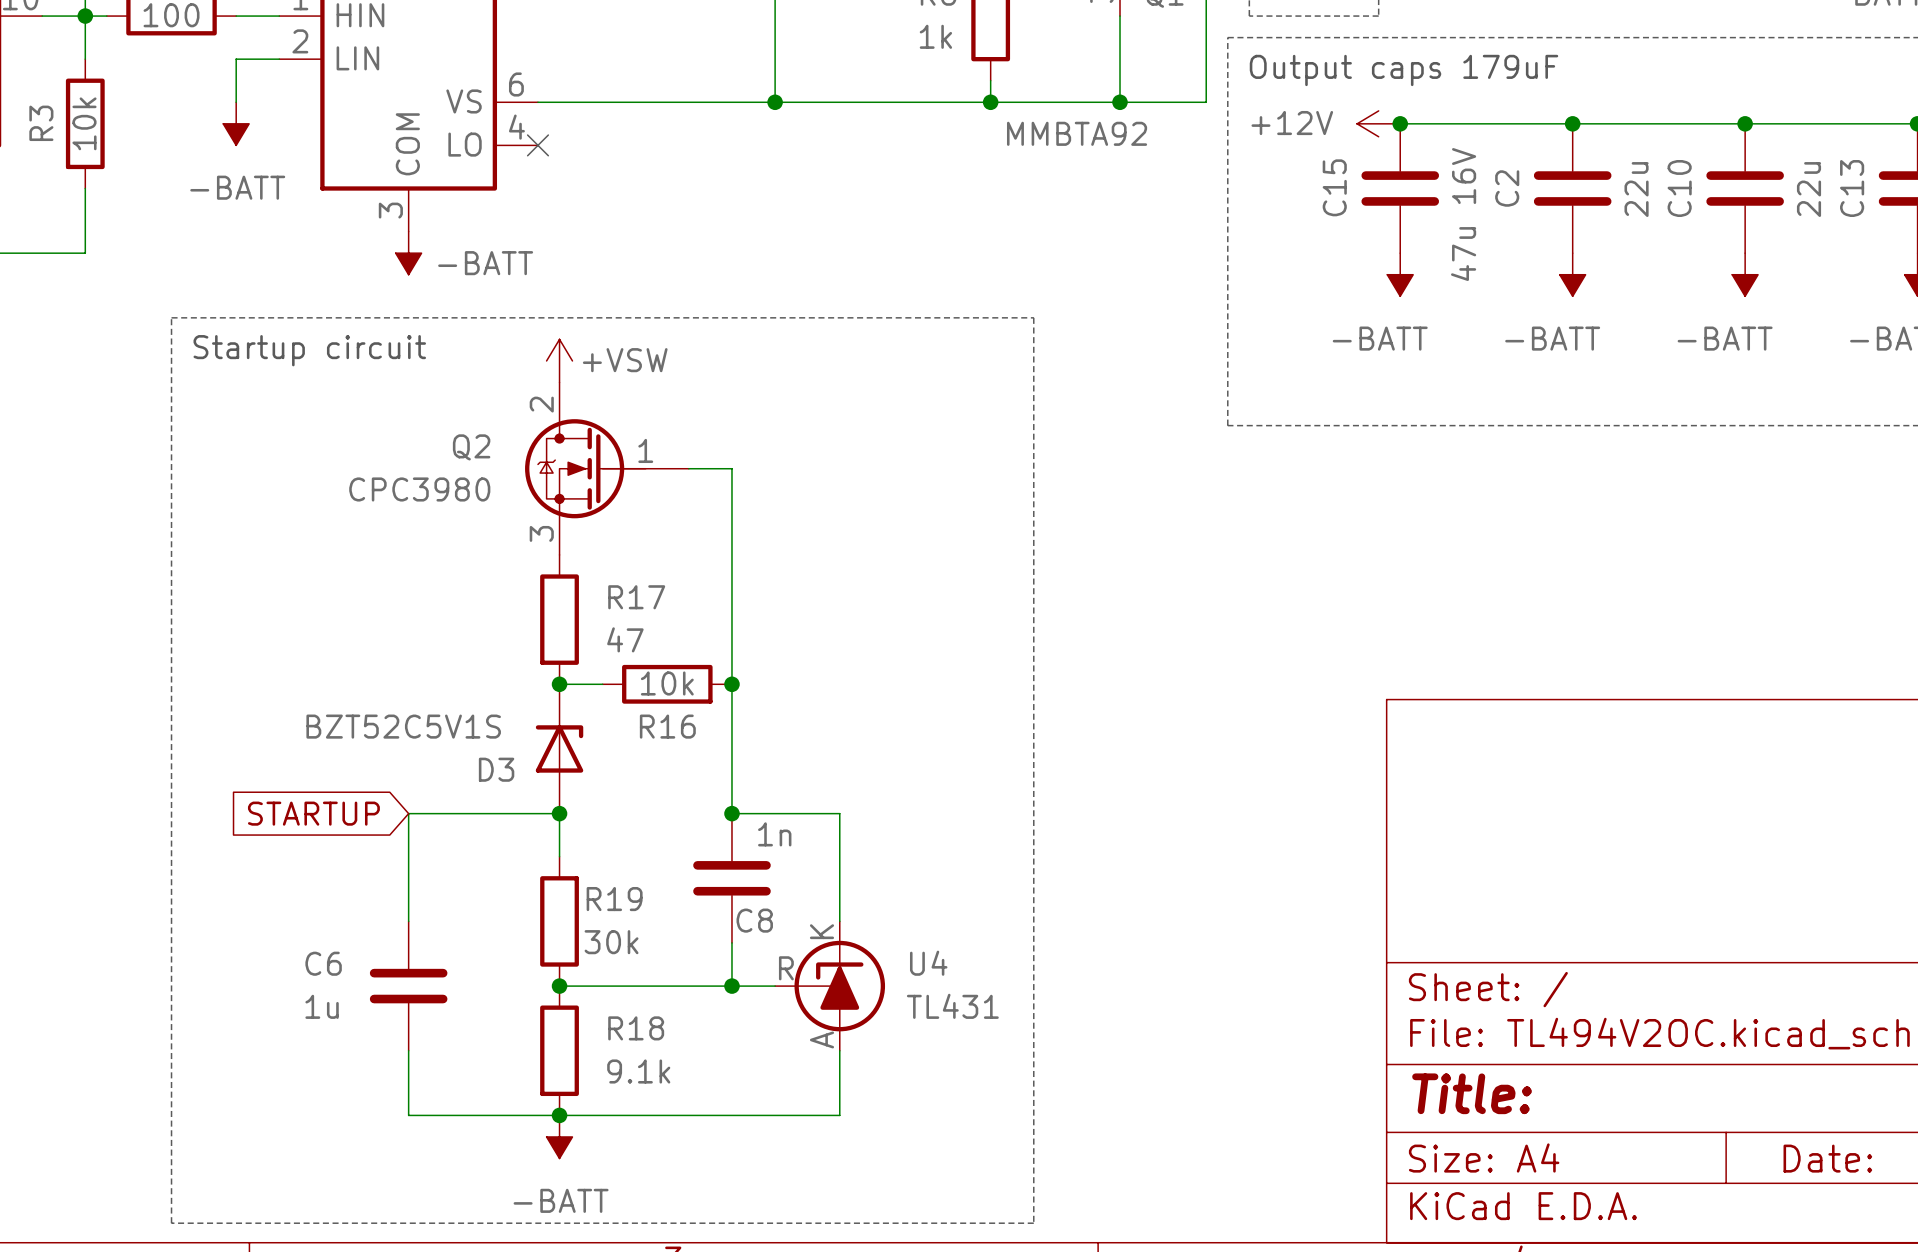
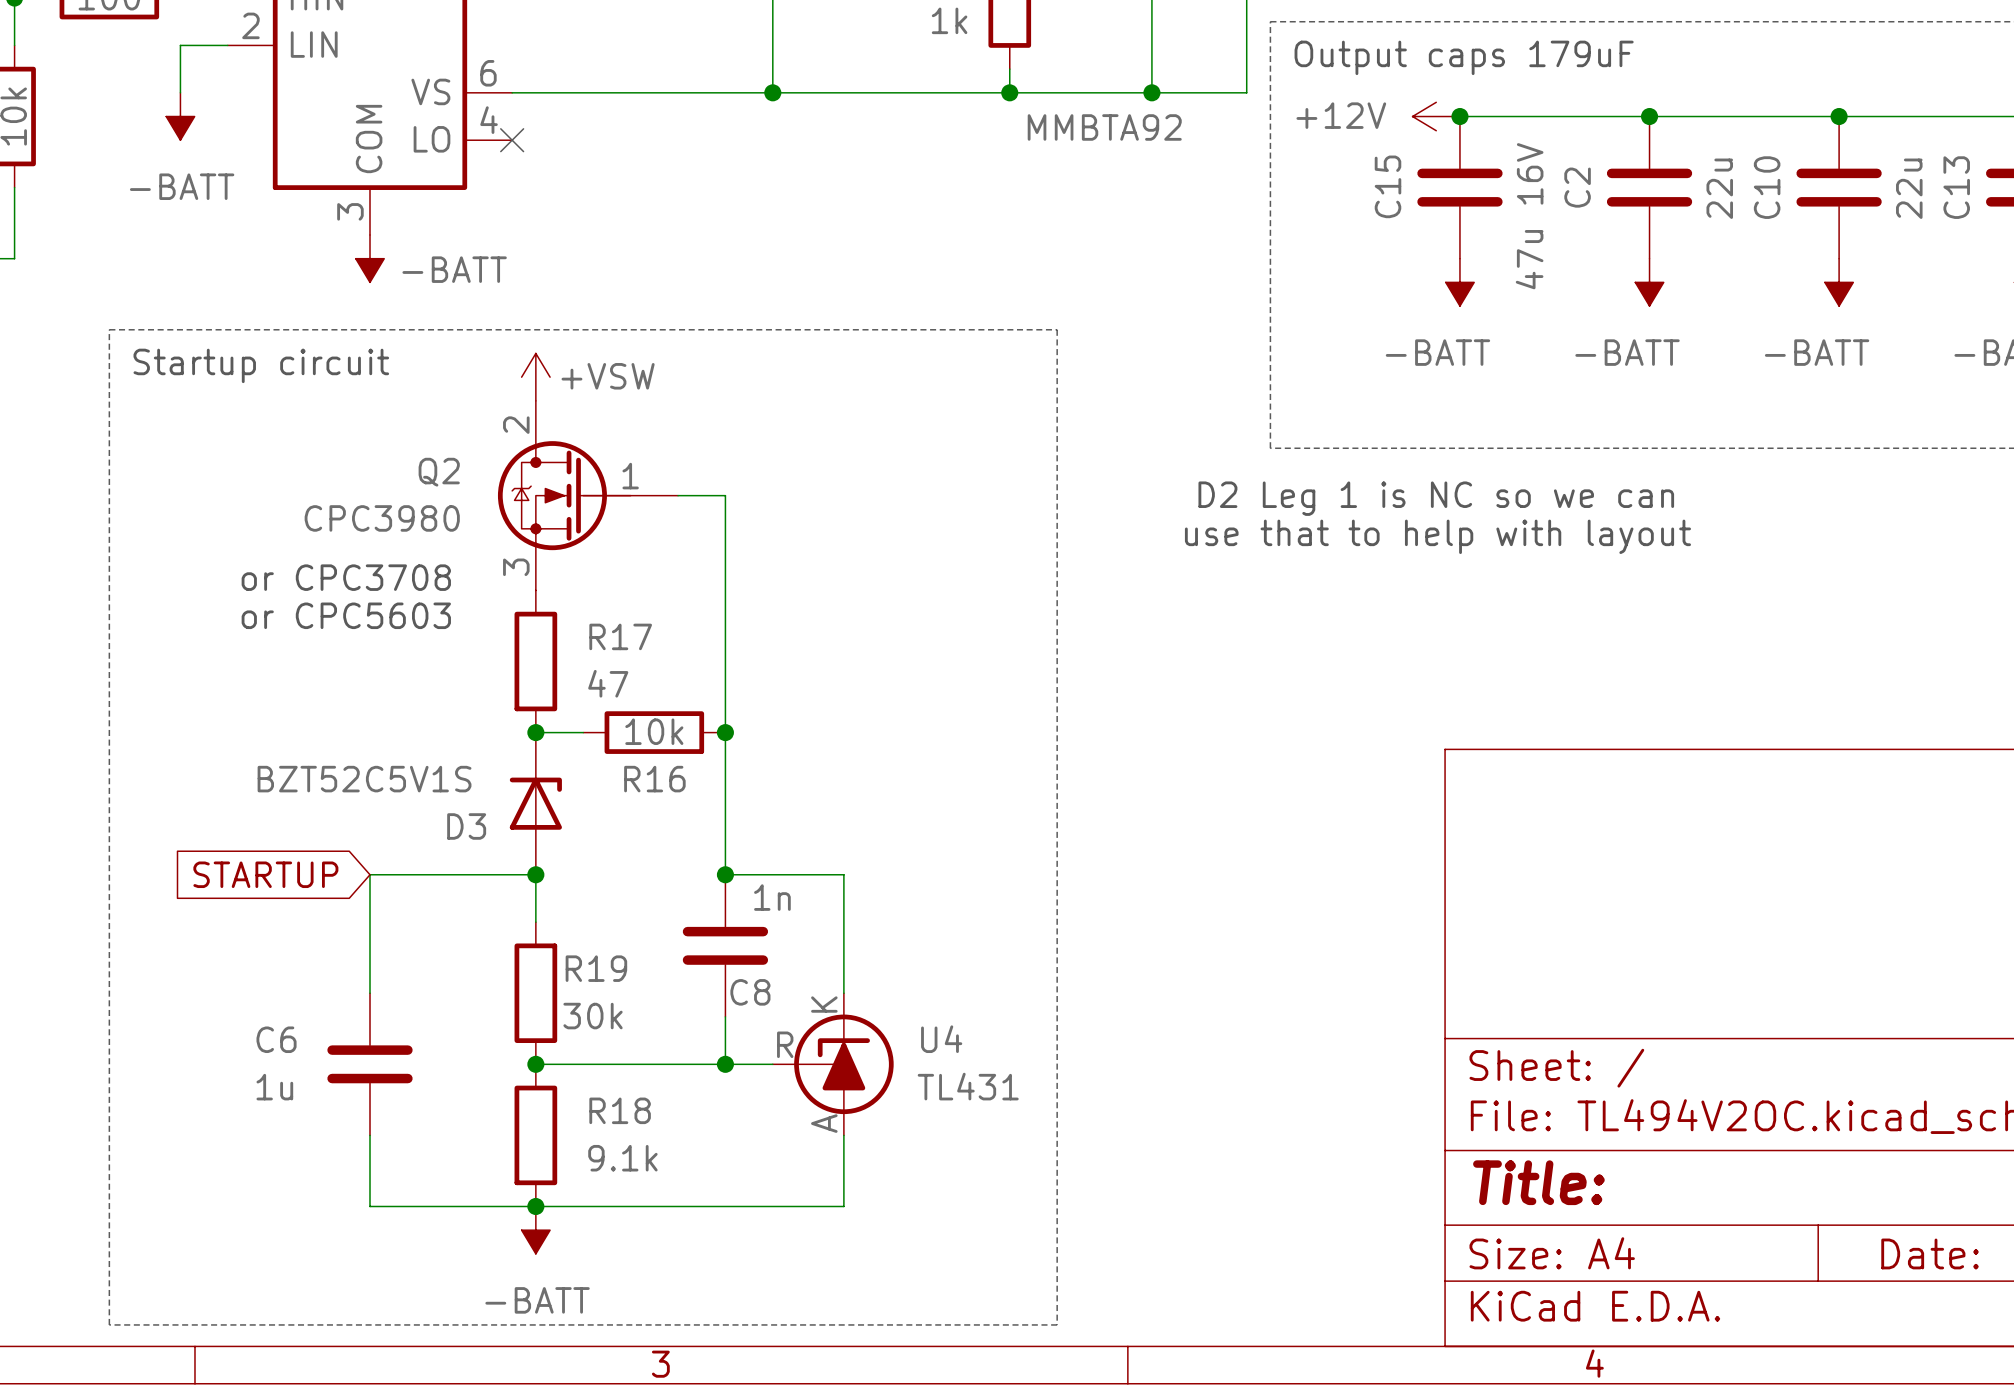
text: none -> D2 Leg 1 is NC so we can (1436, 498)
text: none -> use that to help with layout (1437, 536)
text: none -> or CPC3708 (346, 577)
text: none -> or CPC5603 (346, 615)

